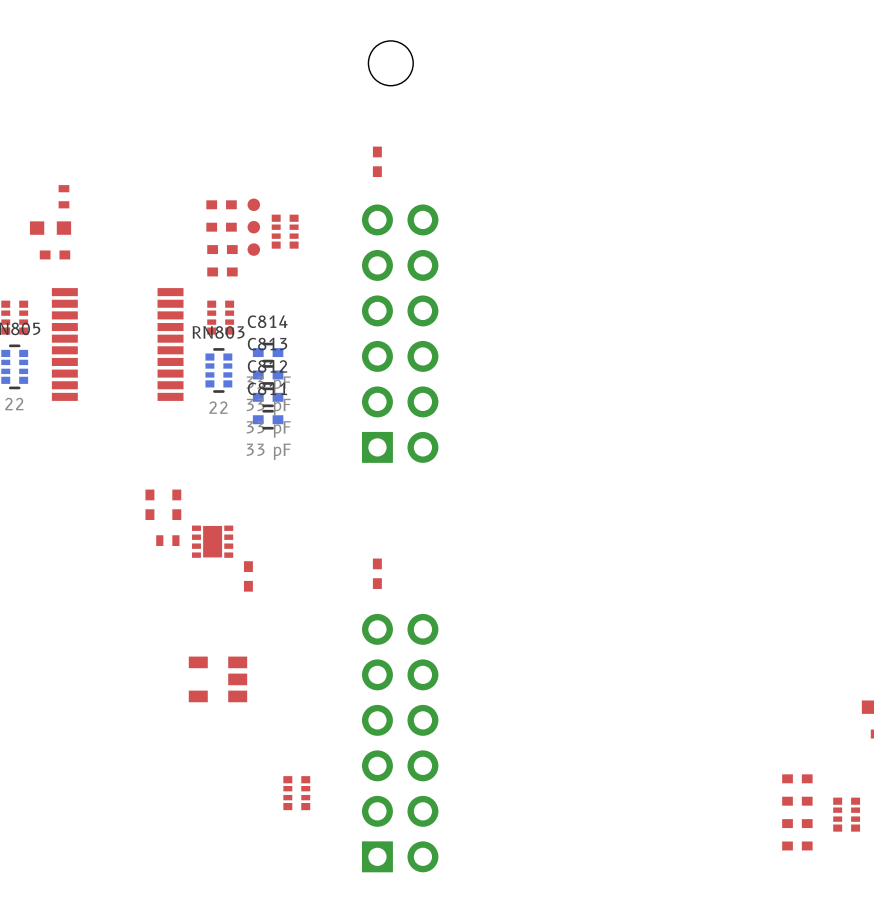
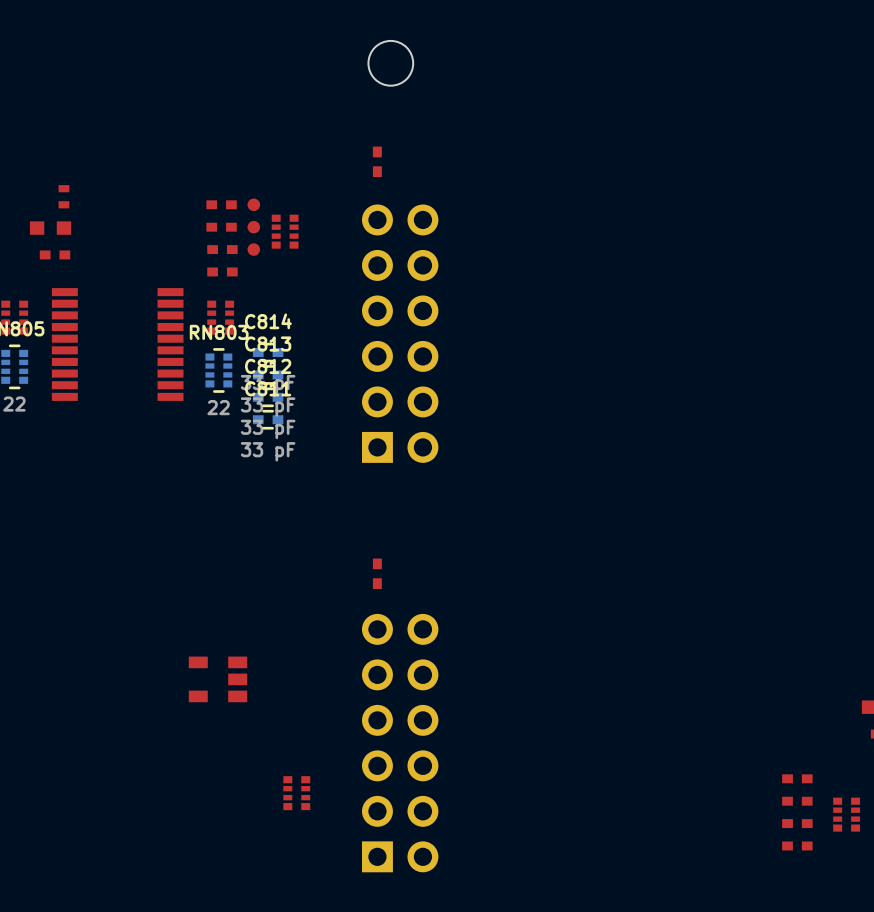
part: (149, 504) -> none
part: (176, 504) -> none
part: (167, 540) -> none
part: (212, 541) -> none
part: (248, 576) -> none

